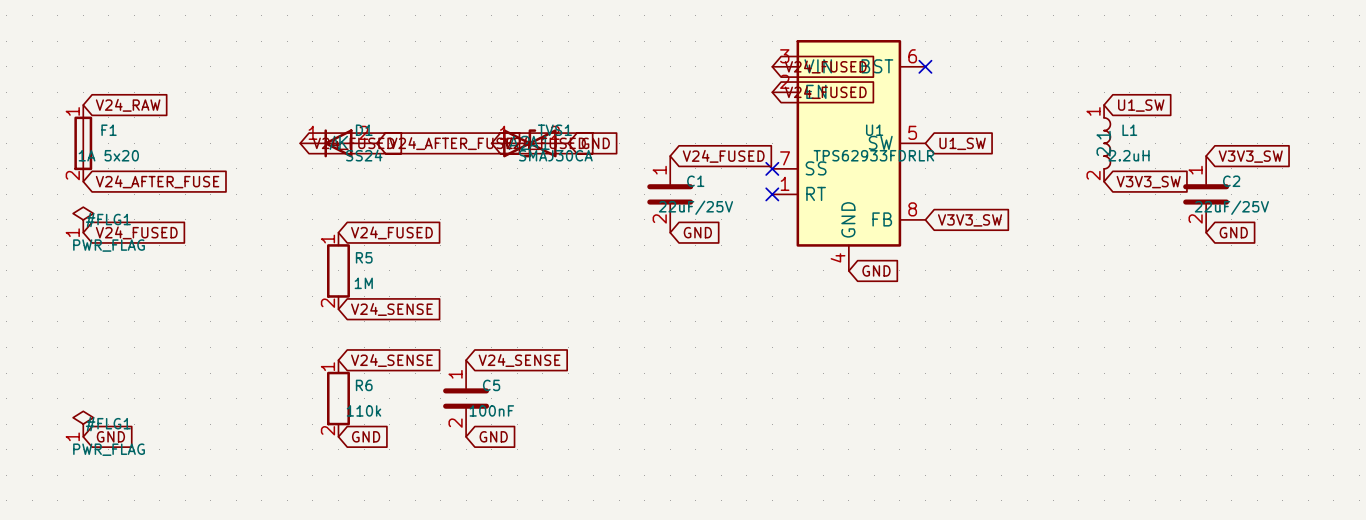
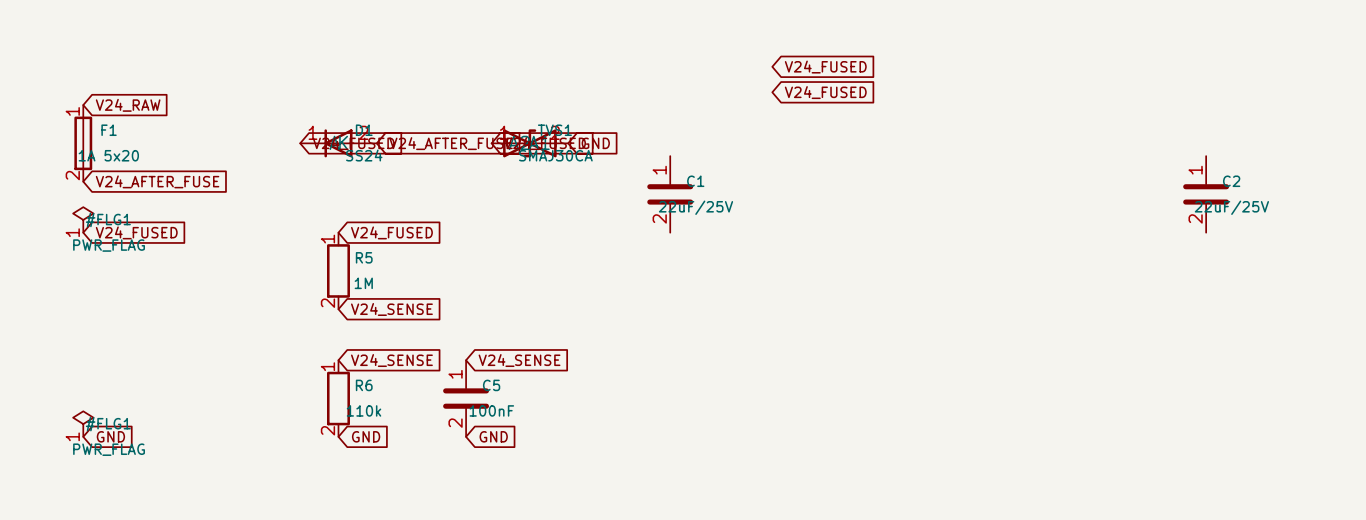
no-connect mark: (925, 66) -> none
global label: U1_SW (1141, 105) -> none
global label: U1_SW (962, 143) -> none
L1: 2.2uH (1107, 143) -> none
U1: TPS62933FDRLR (848, 155) -> none
global label: V24_FUSED (723, 156) -> none
global label: V3V3_SW (1250, 156) -> none
no-connect mark: (772, 168) -> none
global label: V3V3_SW (1148, 182) -> none
no-connect mark: (772, 194) -> none
global label: V3V3_SW (970, 220) -> none
global label: GND (697, 232) -> none
global label: GND (1233, 232) -> none
global label: GND (876, 270) -> none

